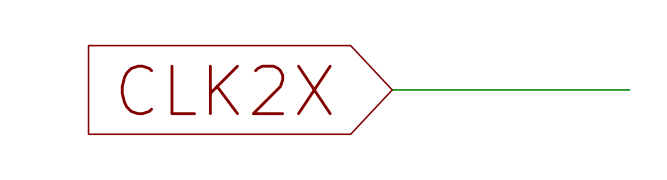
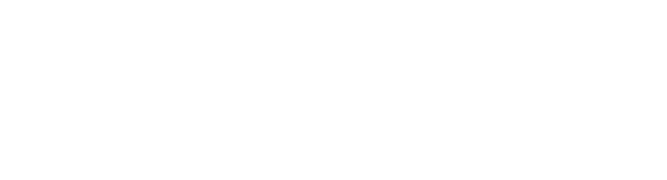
global label: CLK2X (226, 89) -> none
wire: (392, 89) (629, 89) -> none

